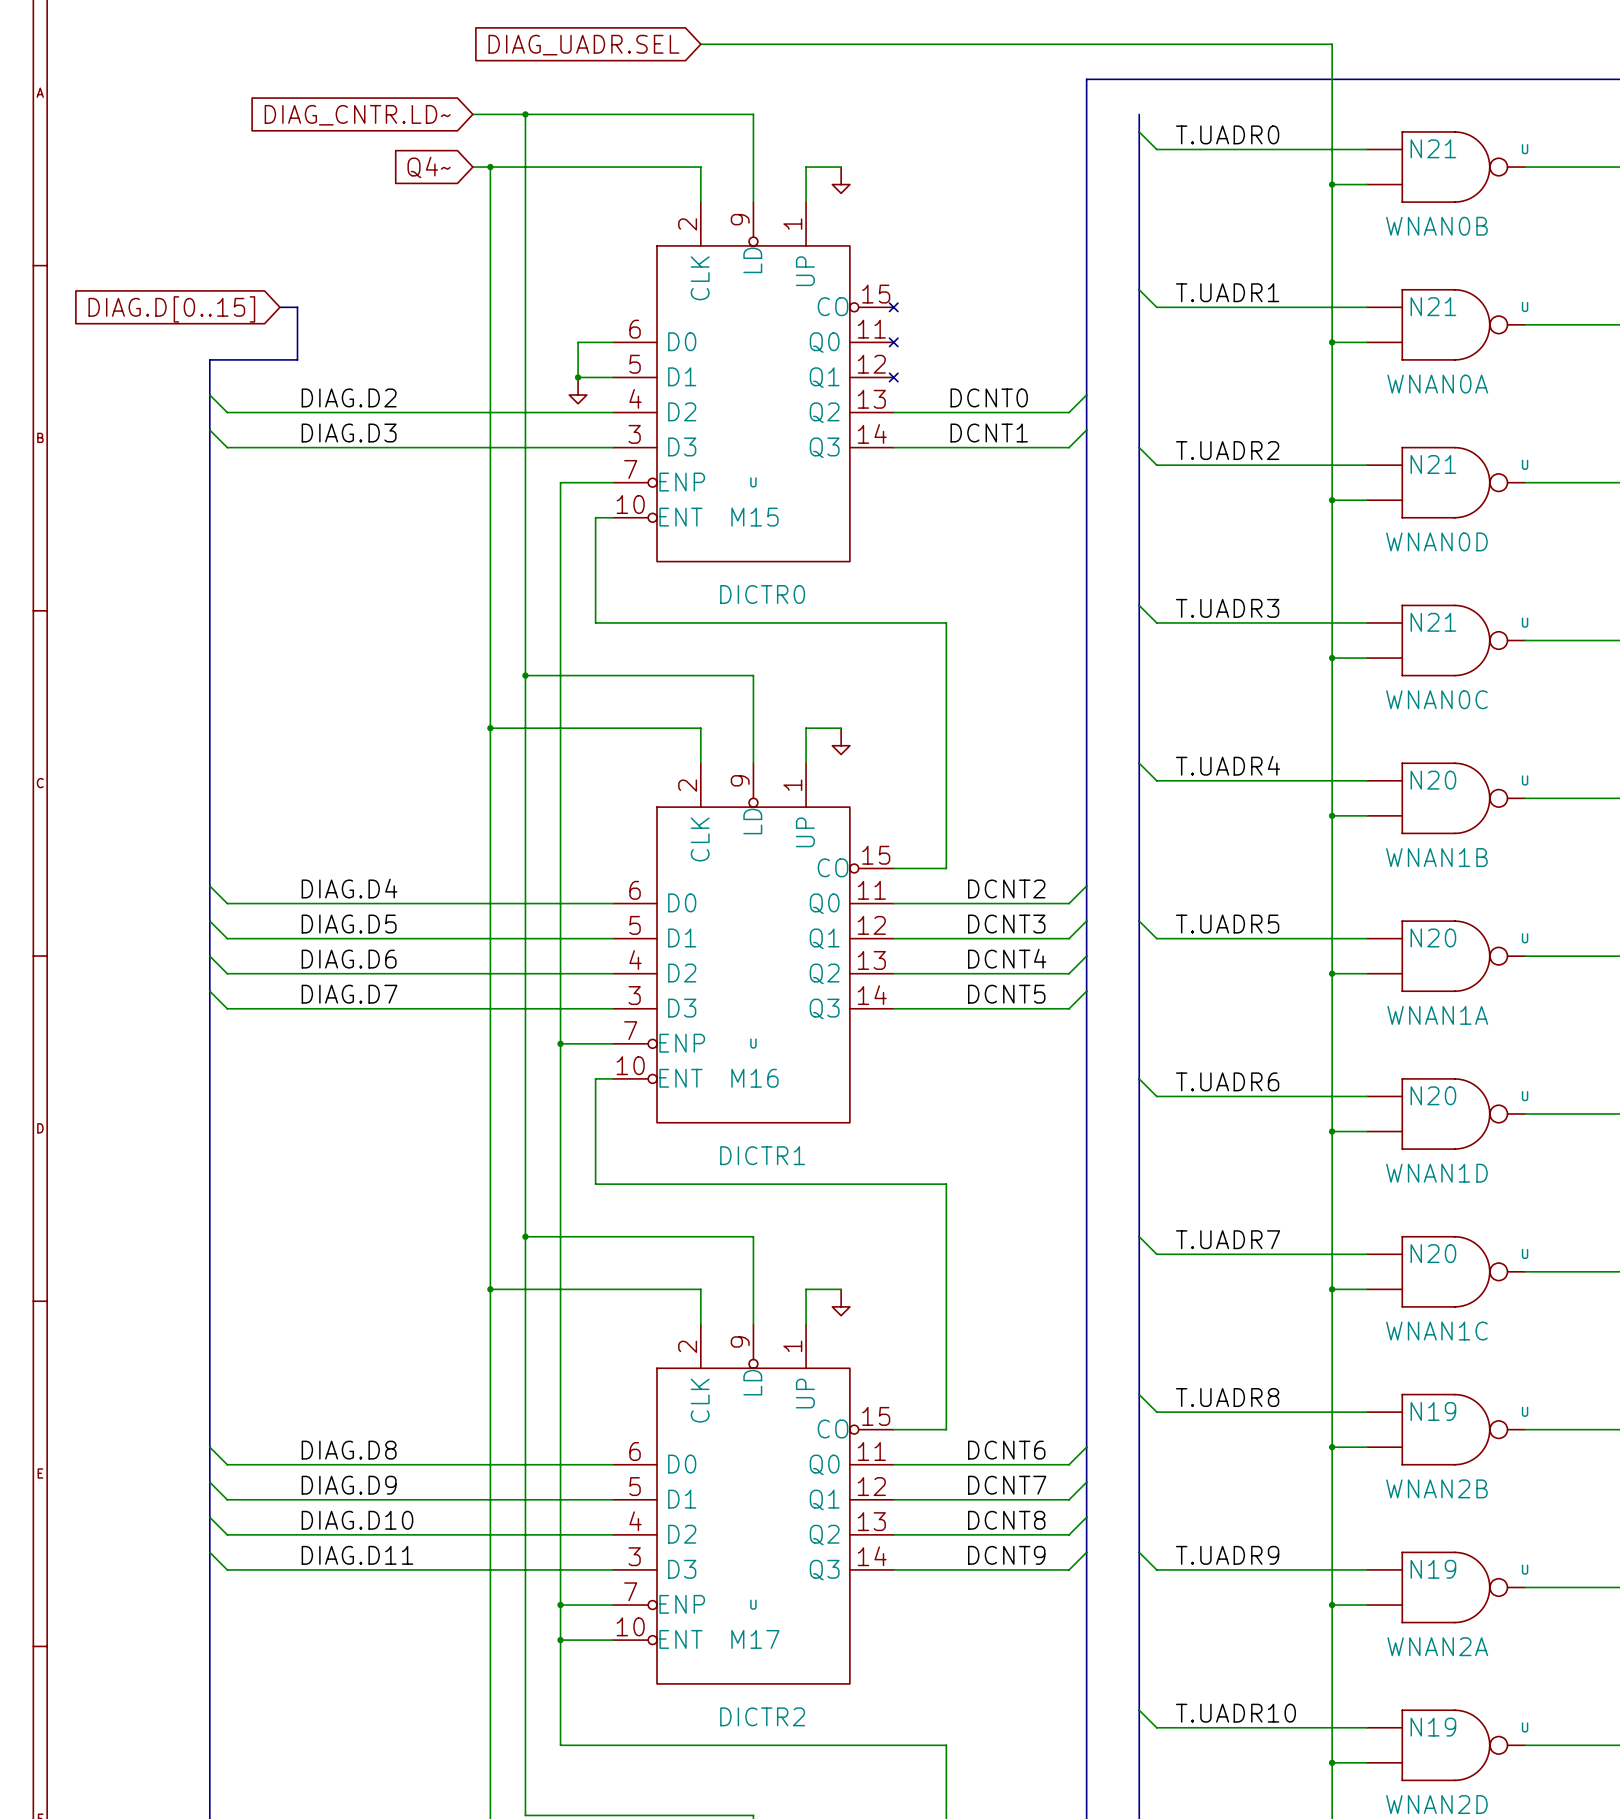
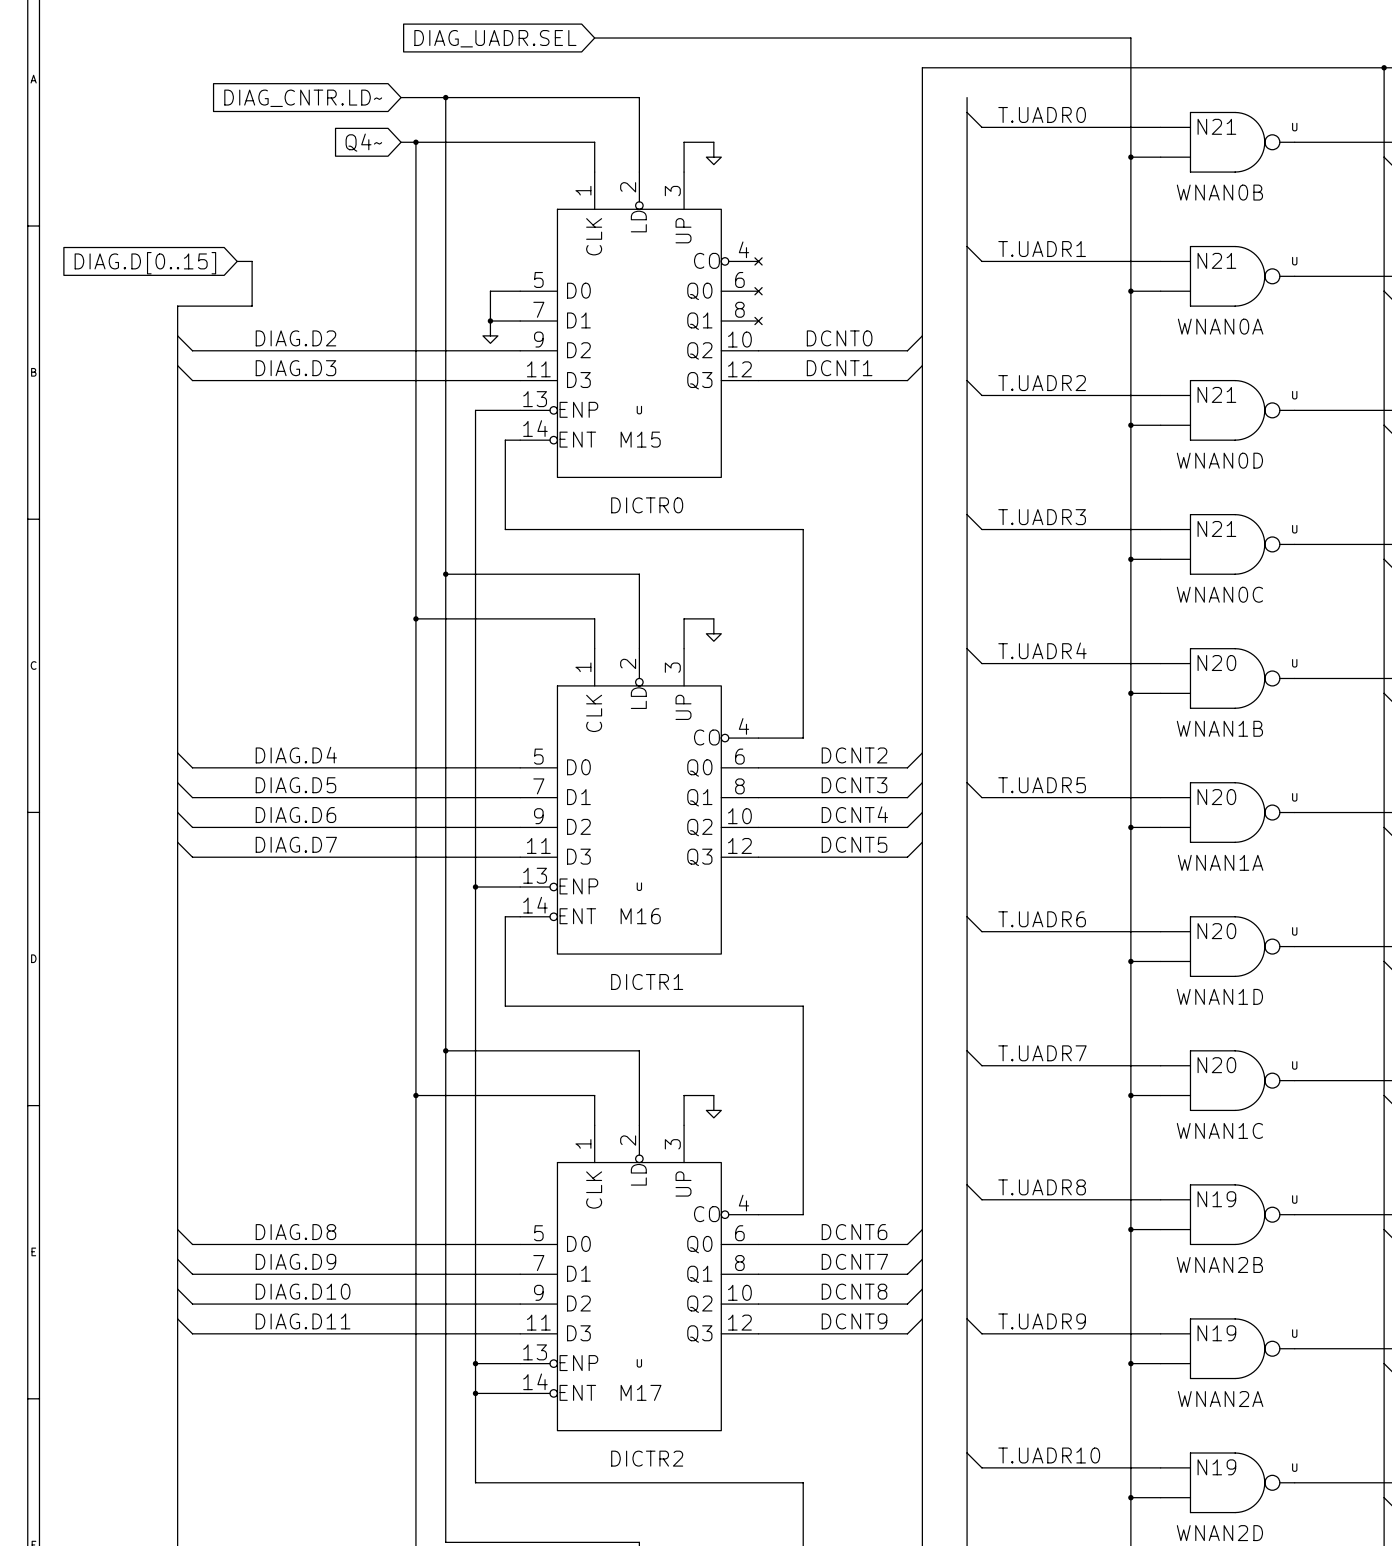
U symbol: [613, 202, 894, 562] -> [520, 172, 759, 478]
U symbol: [613, 763, 894, 1123] -> [520, 648, 759, 955]
U symbol: [613, 1324, 894, 1684] -> [520, 1125, 759, 1431]

